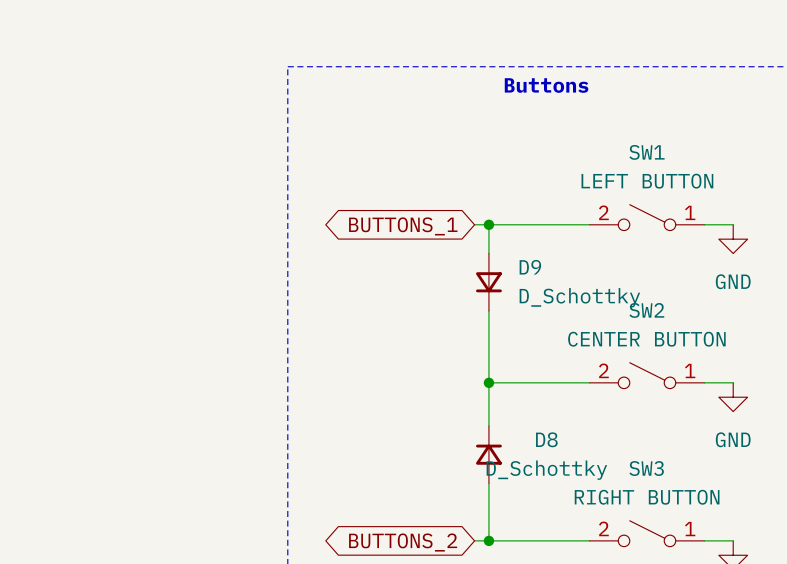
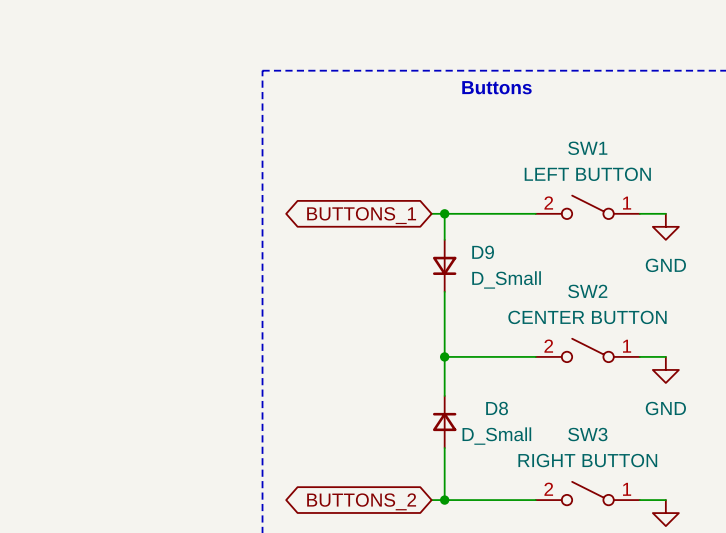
D9 value: D_Schottky (579, 297) -> D_Small (506, 279)
D8 value: D_Schottky (546, 470) -> D_Small (496, 436)

